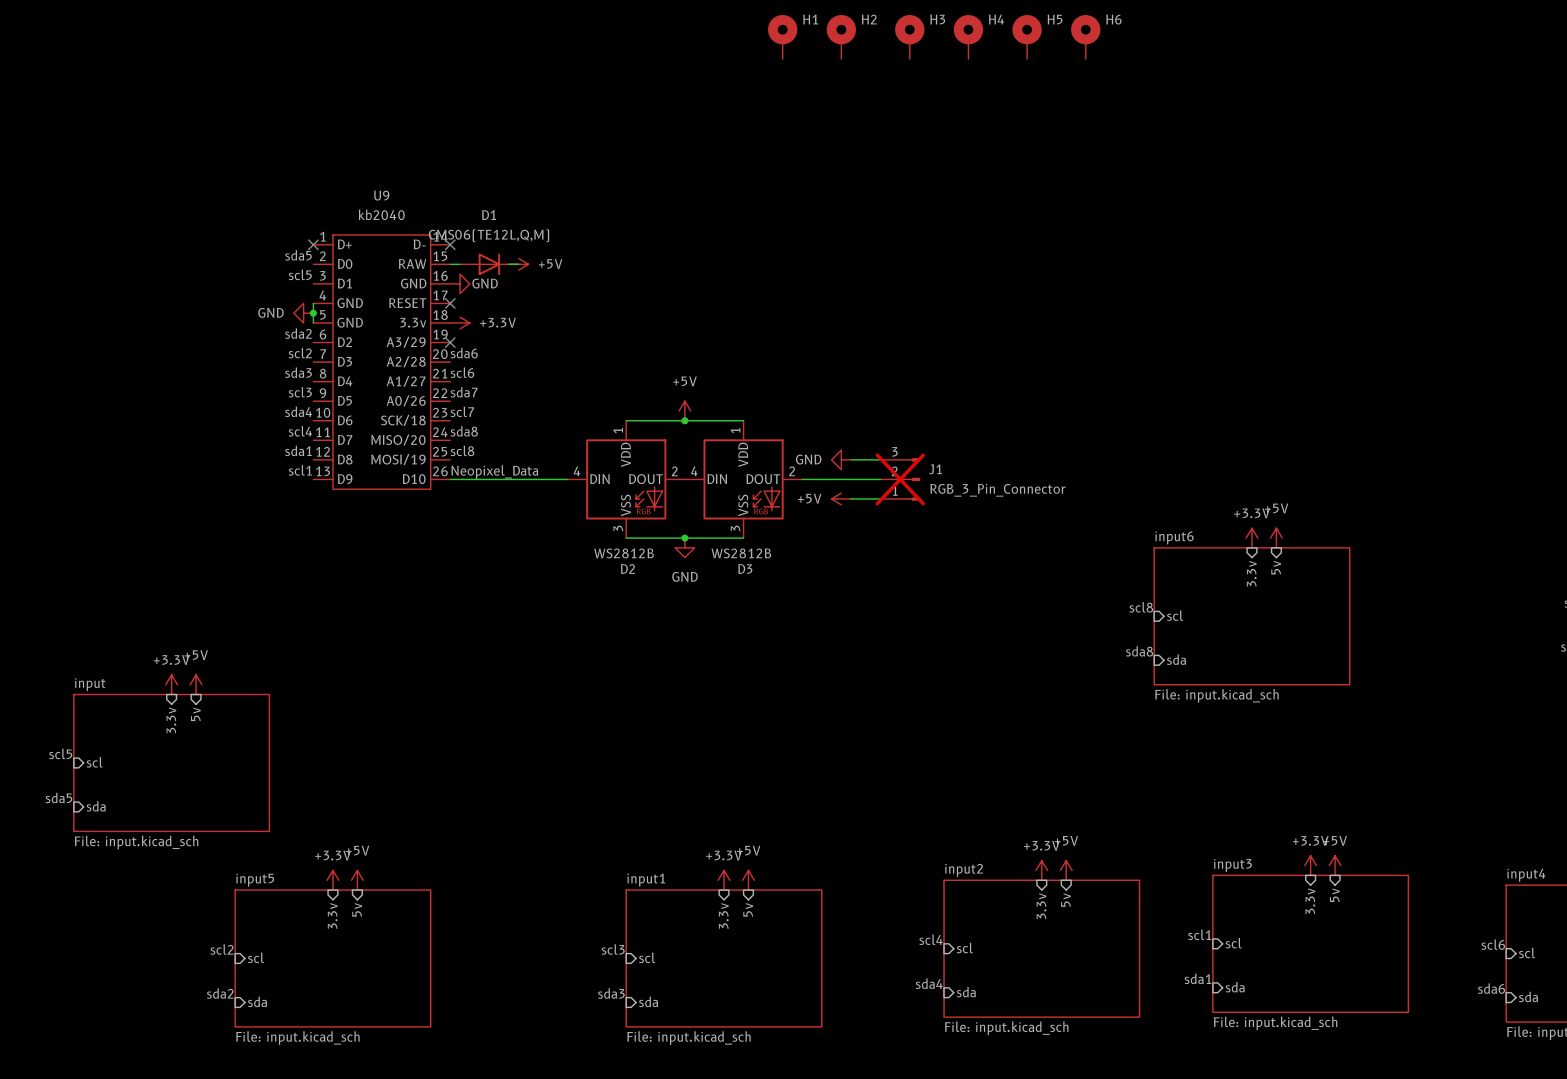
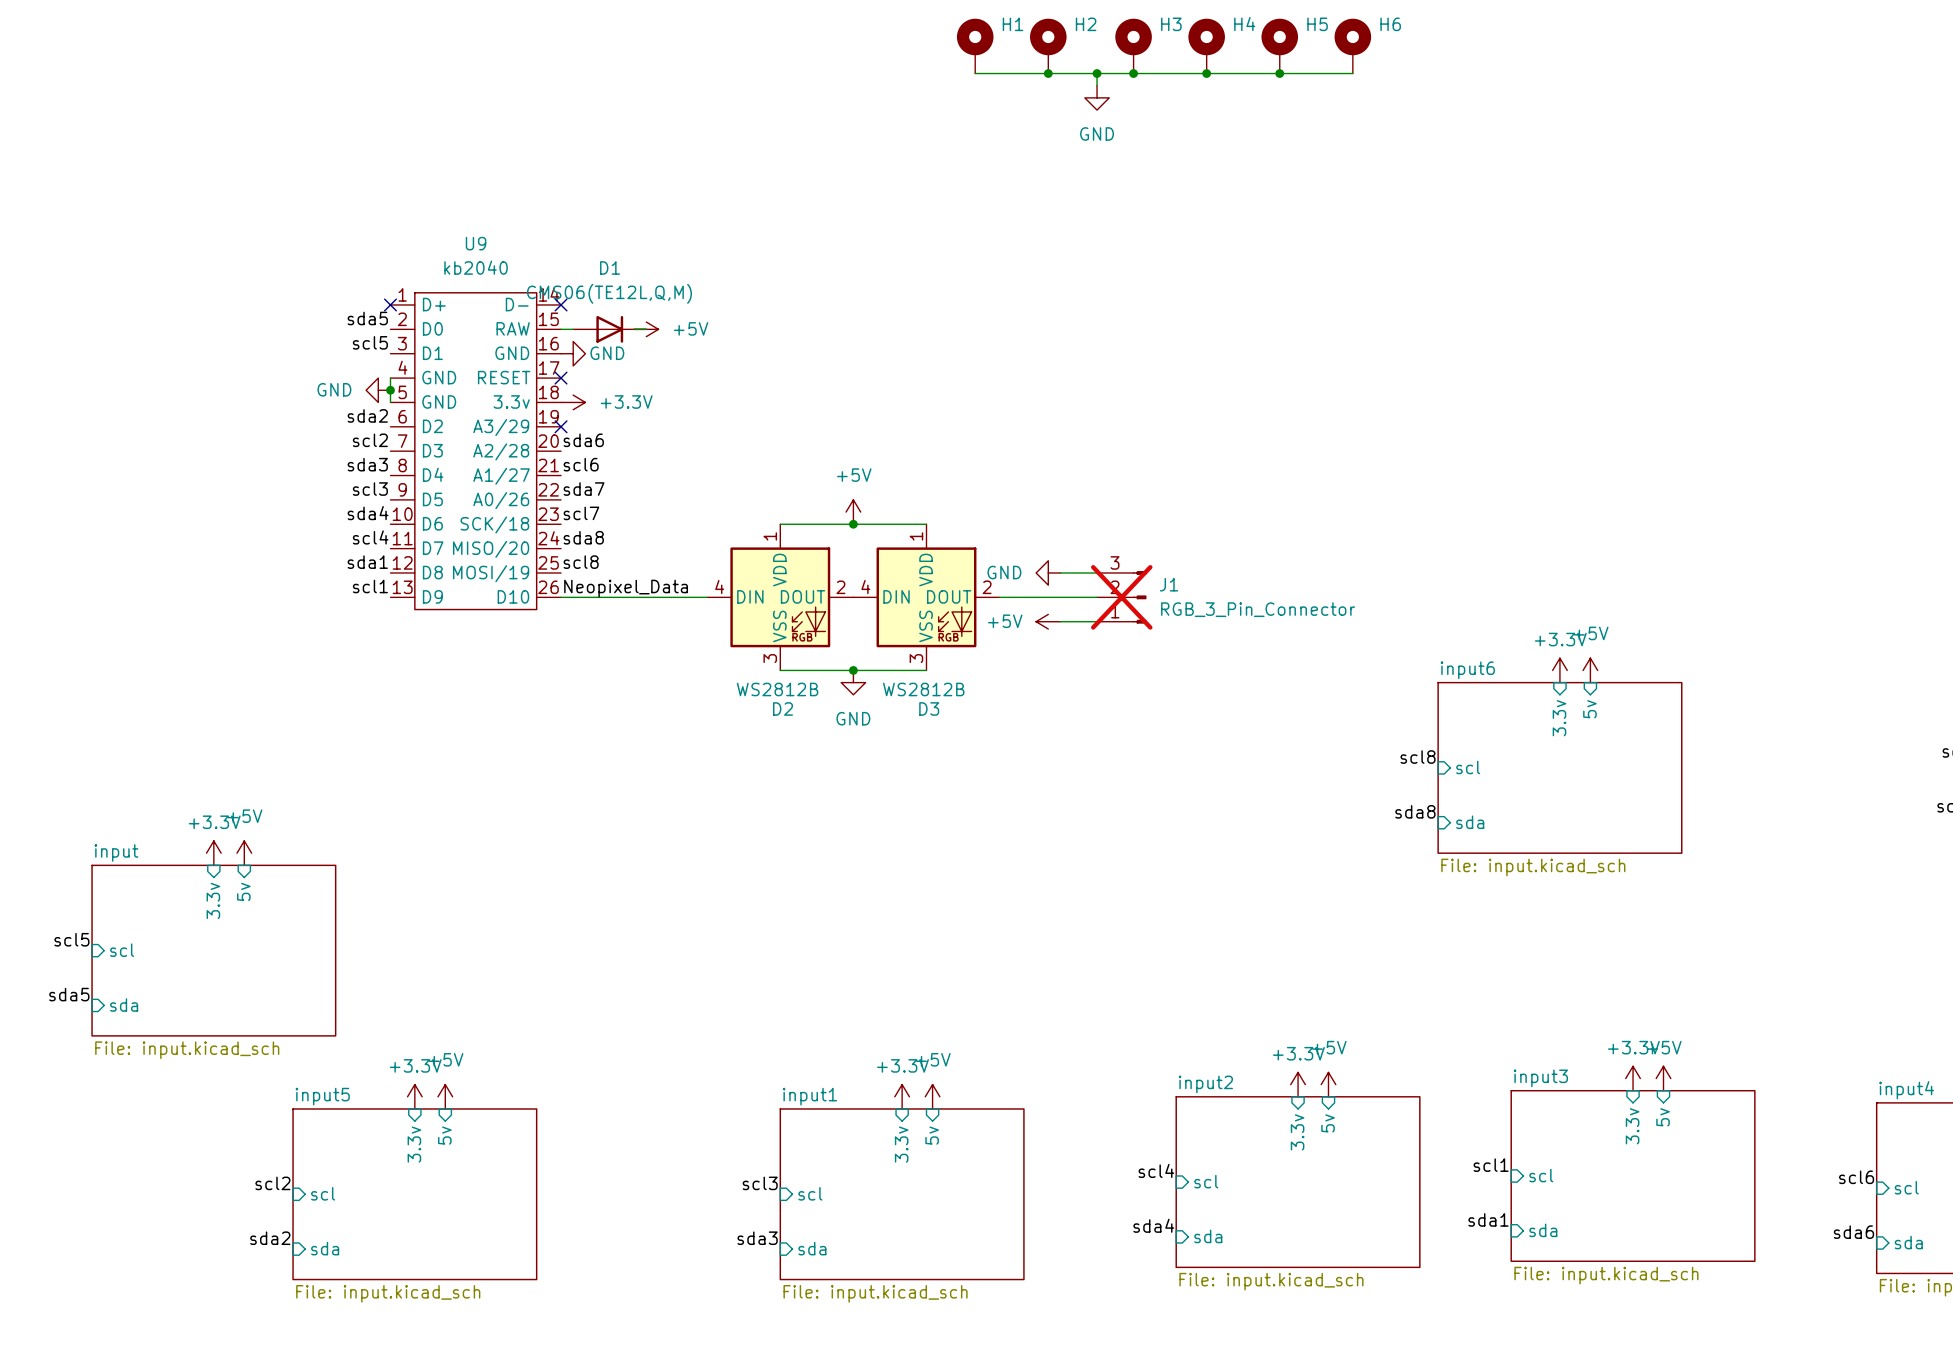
wire: none -> (975, 73) (1352, 73)
junction: none -> (1048, 73)
wire: none -> (1097, 73) (1097, 85)
junction: none -> (1097, 73)
junction: none -> (1133, 73)
junction: none -> (1206, 73)
junction: none -> (1279, 73)
power symbol: none -> GND (1097, 97)

